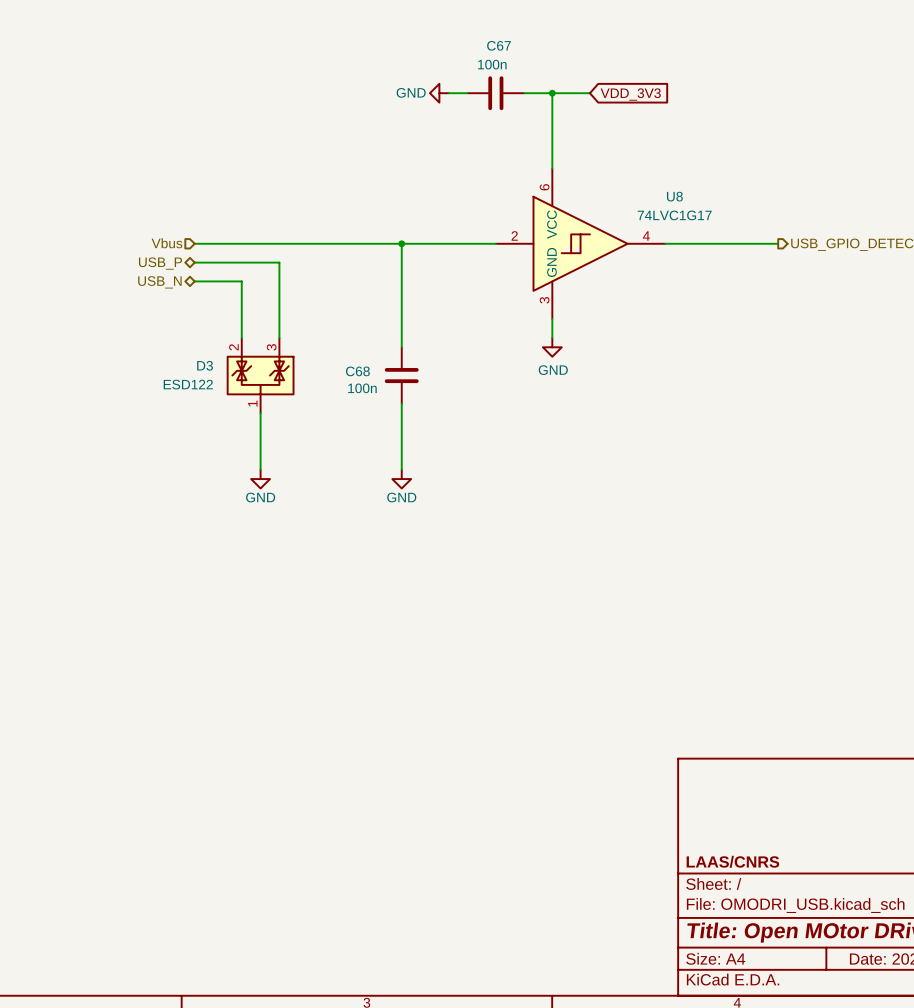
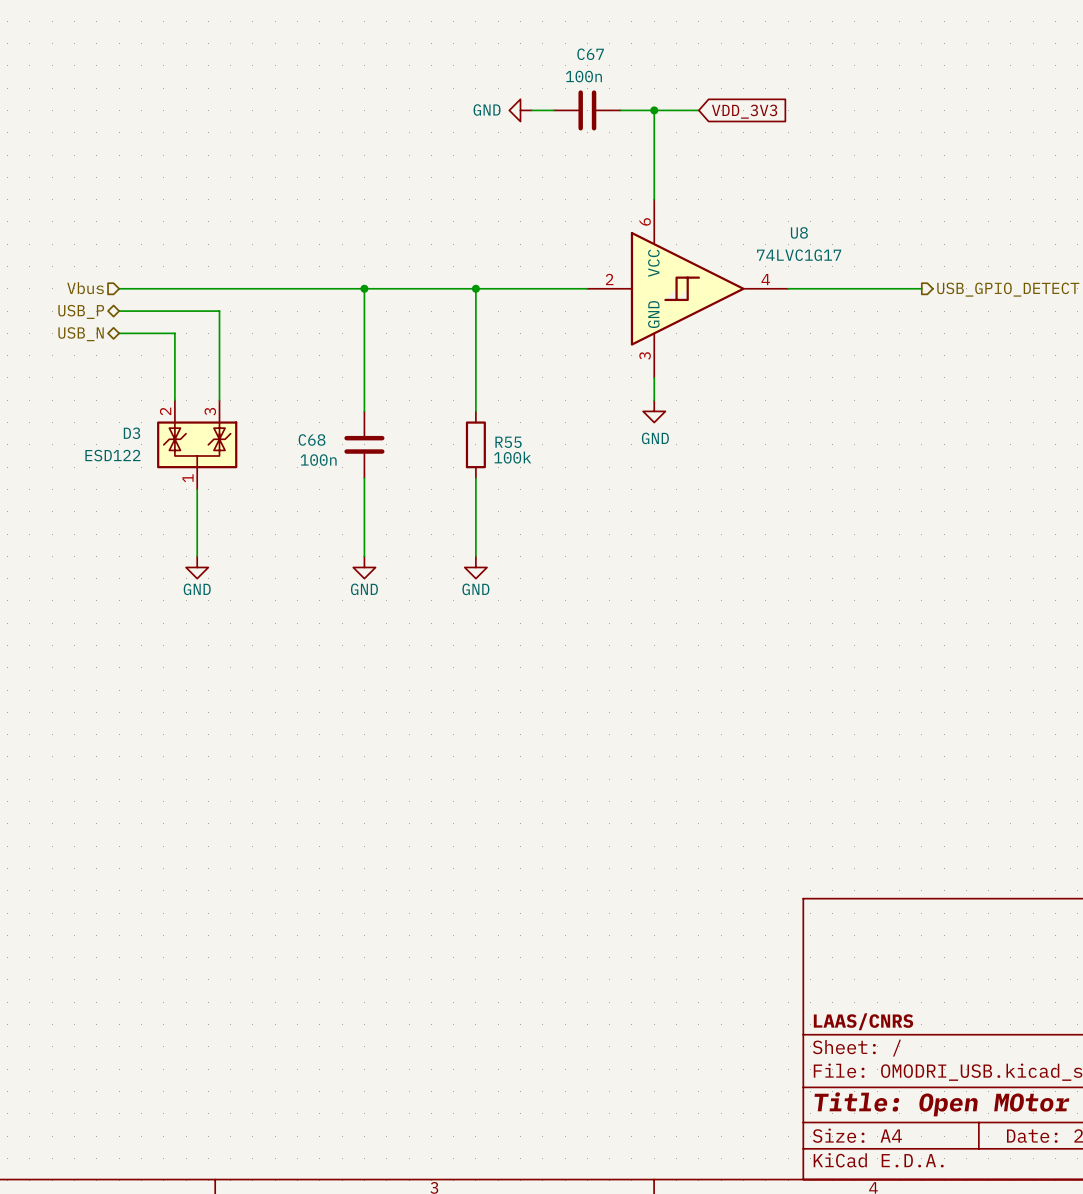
wire: none -> (119, 288) (230, 288)
hierarchical label position: Vbus (166, 243) -> Vbus (85, 288)
wire: none -> (364, 288) (364, 411)
junction: none -> (364, 288)
wire: (194, 262) (279, 262) (279, 337) -> (119, 311) (219, 311) (219, 400)
hierarchical label position: USB_P (160, 263) -> USB_P (81, 311)
wire: (194, 281) (241, 281) (241, 337) -> (119, 333) (174, 333) (174, 400)
hierarchical label position: USB_N (159, 282) -> USB_N (81, 334)
D3 position: (260, 375) -> (197, 444)
C68 position: (401, 375) -> (364, 444)
R55: none -> 100k (475, 444)
wire: none -> (364, 478) (364, 556)
wire: (260, 413) (260, 469) -> (197, 489) (197, 556)
power symbol: none -> GND (197, 567)
power symbol: GND (260, 479) -> none
power symbol: none -> GND (364, 567)

